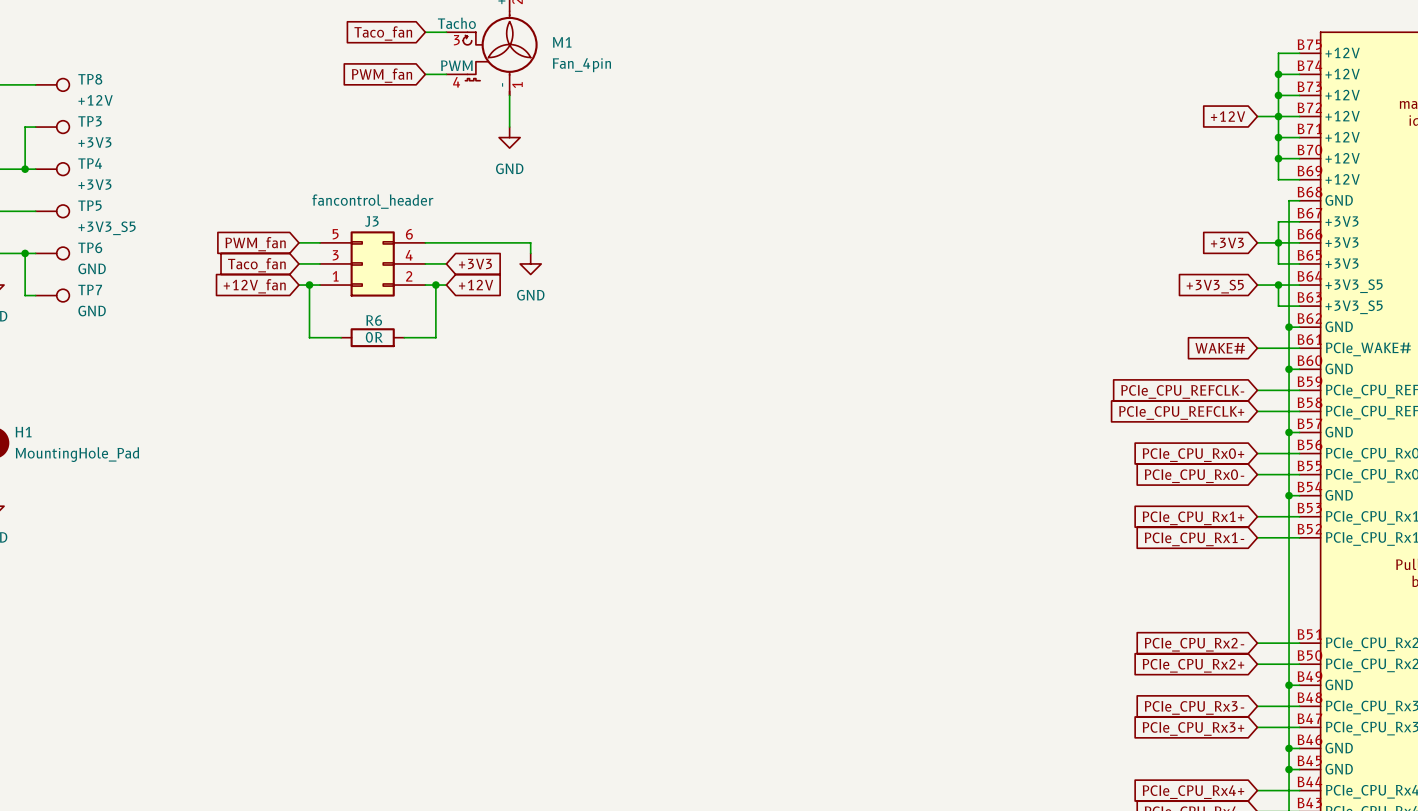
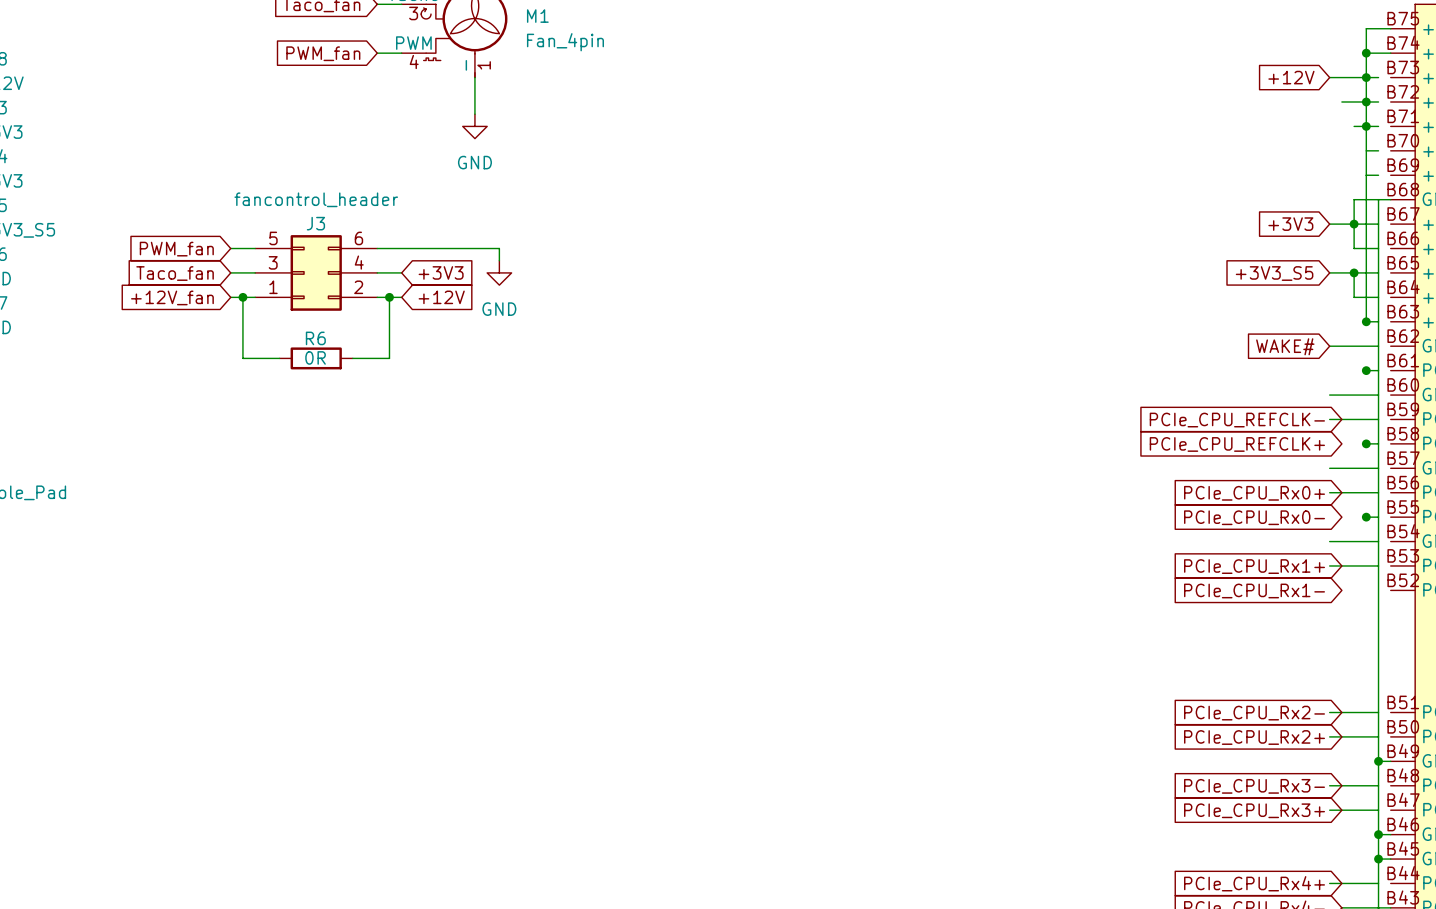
wire: none -> (1329, 77) (1366, 77)
wire: (1289, 95) (1299, 95) -> none
global label position: +12V (1228, 116) -> +12V (1291, 77)
wire: (1289, 116) (1299, 116) -> none
wire: (1289, 137) (1299, 137) -> (1354, 126) (1366, 126)
junction: (1278, 158) -> none
wire: (1289, 158) (1299, 158) -> none
wire: none -> (1366, 175) (1366, 224) (1329, 224)
wire: (1289, 179) (1299, 179) -> none
junction: none -> (1354, 224)
wire: (1289, 221) (1299, 221) -> none
global label position: +3V3 (1227, 242) -> +3V3 (1290, 224)
wire: (1257, 242) (1267, 242) -> (1378, 199) (1354, 199) (1354, 248)
junction: (1278, 242) -> none
wire: (1289, 242) (1299, 242) -> none
wire: none -> (1329, 272) (1366, 272) (1366, 297)
junction: none -> (1354, 272)
wire: (1289, 263) (1299, 263) -> none
wire: (1257, 285) (1267, 285) -> (1354, 272) (1354, 297)
junction: (1278, 285) -> none
wire: (1289, 285) (1299, 285) -> none
global label position: +3V3_S5 (1215, 286) -> +3V3_S5 (1274, 273)
junction: none -> (1366, 321)
wire: (1289, 306) (1299, 306) -> none
wire: (1289, 327) (1299, 327) -> (1378, 346) (1329, 346)
junction: (1289, 327) -> none
global label position: WAKE# (1220, 348) -> WAKE# (1285, 346)
wire: (1257, 348) (1278, 348) -> none
junction: none -> (1366, 370)
wire: (1289, 348) (1299, 348) -> none
wire: (1289, 369) (1299, 369) -> (1378, 395) (1329, 395)
junction: (1289, 369) -> none
wire: (1289, 390) (1299, 390) -> (1329, 419) (1341, 419)
wire: (1257, 411) (1278, 411) -> none
junction: none -> (1366, 443)
wire: (1289, 411) (1299, 411) -> none
wire: (1289, 432) (1299, 432) -> (1378, 468) (1329, 468)
junction: (1289, 432) -> none
wire: (1289, 453) (1299, 453) -> (1329, 492) (1341, 492)
wire: (1257, 474) (1278, 474) -> none
junction: none -> (1366, 517)
wire: (1289, 474) (1299, 474) -> none
wire: (1289, 495) (1299, 495) -> (1378, 541) (1329, 541)
junction: (1289, 495) -> none
wire: (1289, 516) (1299, 516) -> (1329, 565) (1341, 565)
wire: (1257, 537) (1299, 537) -> none
wire: (1289, 643) (1299, 643) -> (1329, 712) (1341, 712)
wire: (1289, 664) (1299, 664) -> (1329, 736) (1341, 736)
wire: (1289, 706) (1299, 706) -> (1329, 785) (1341, 785)
wire: (1289, 727) (1299, 727) -> (1329, 810) (1341, 810)
wire: (1289, 790) (1299, 790) -> (1329, 883) (1341, 883)

